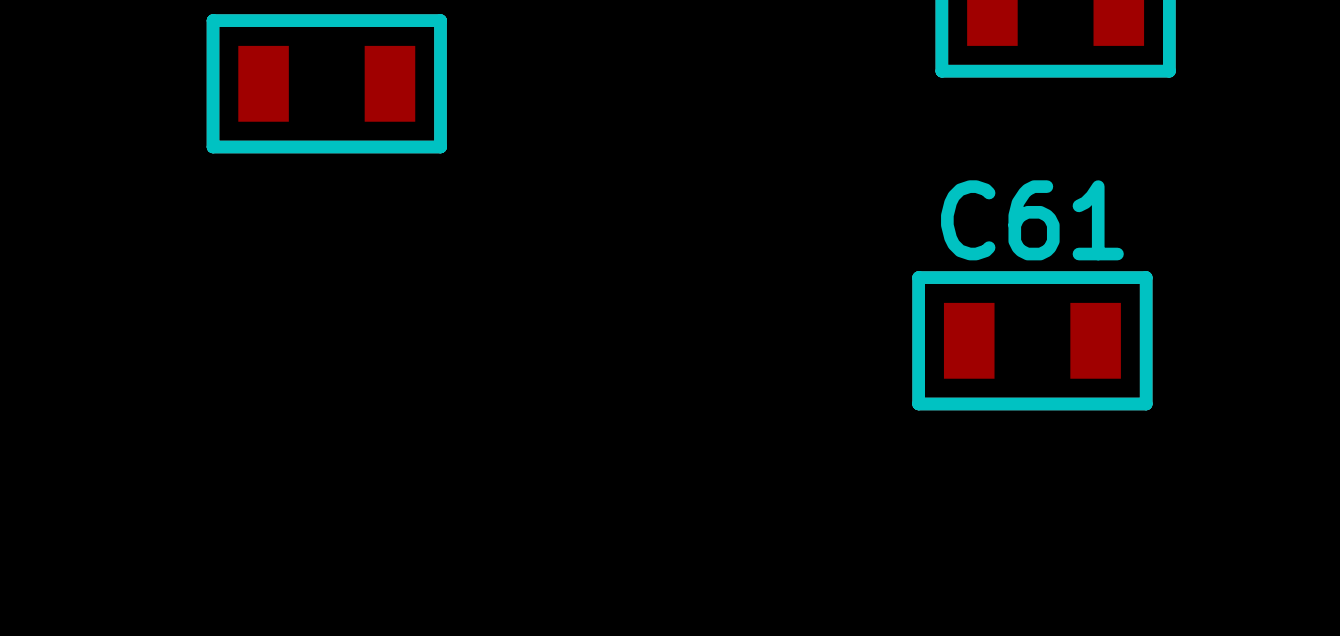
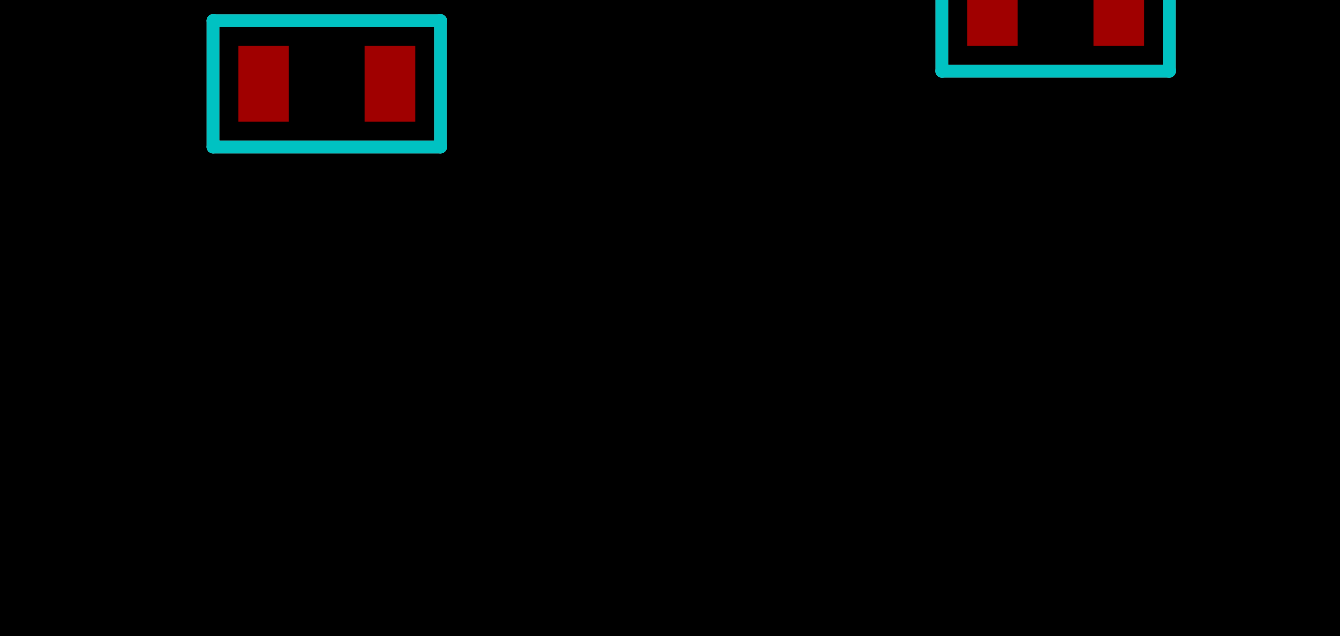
C61: (1032, 340) -> none

